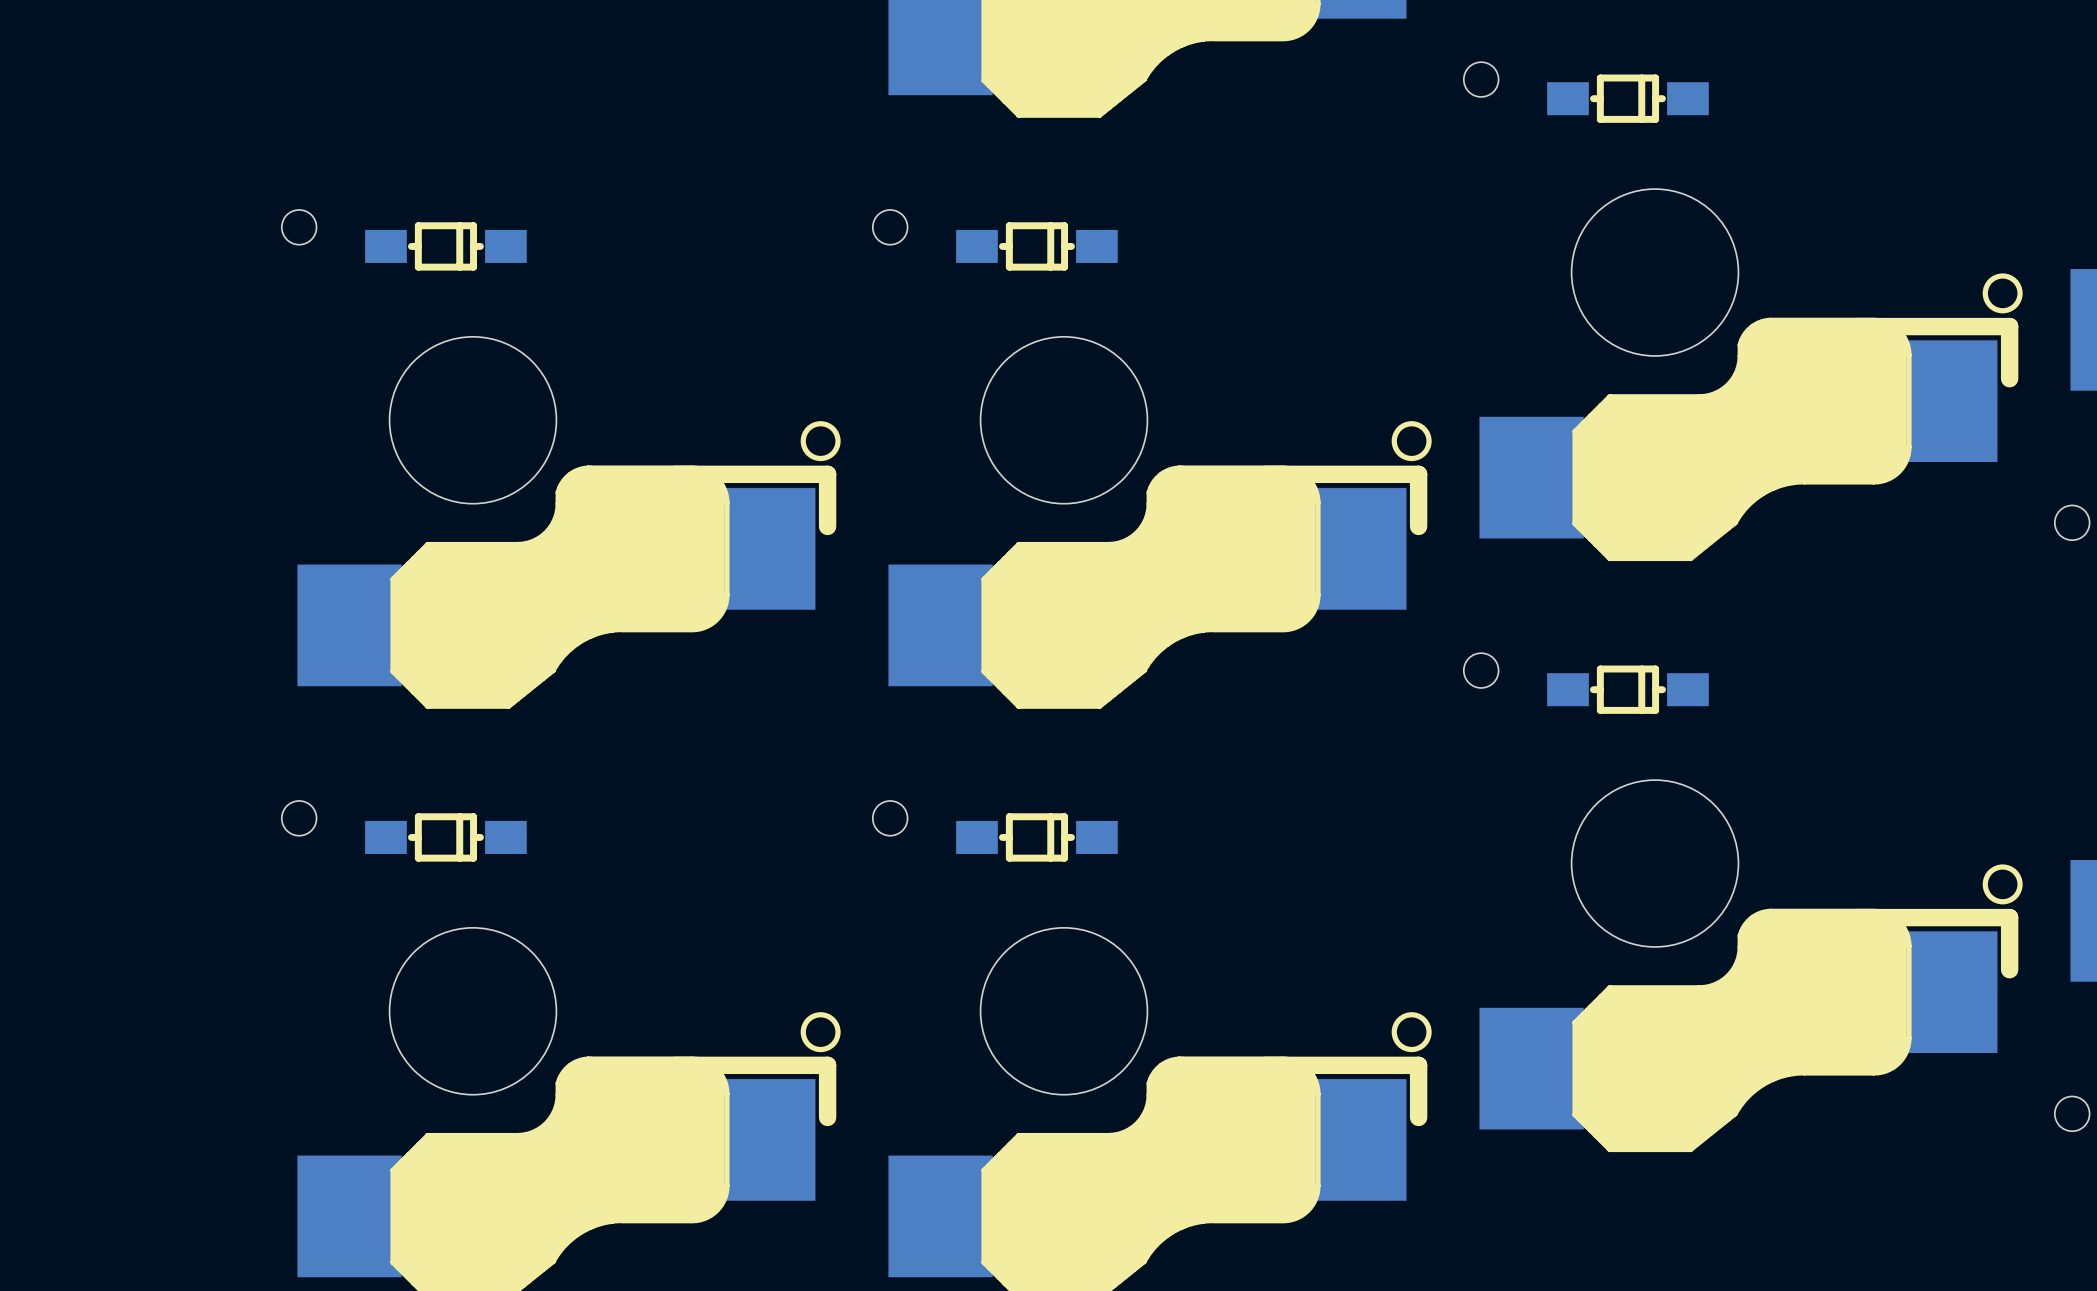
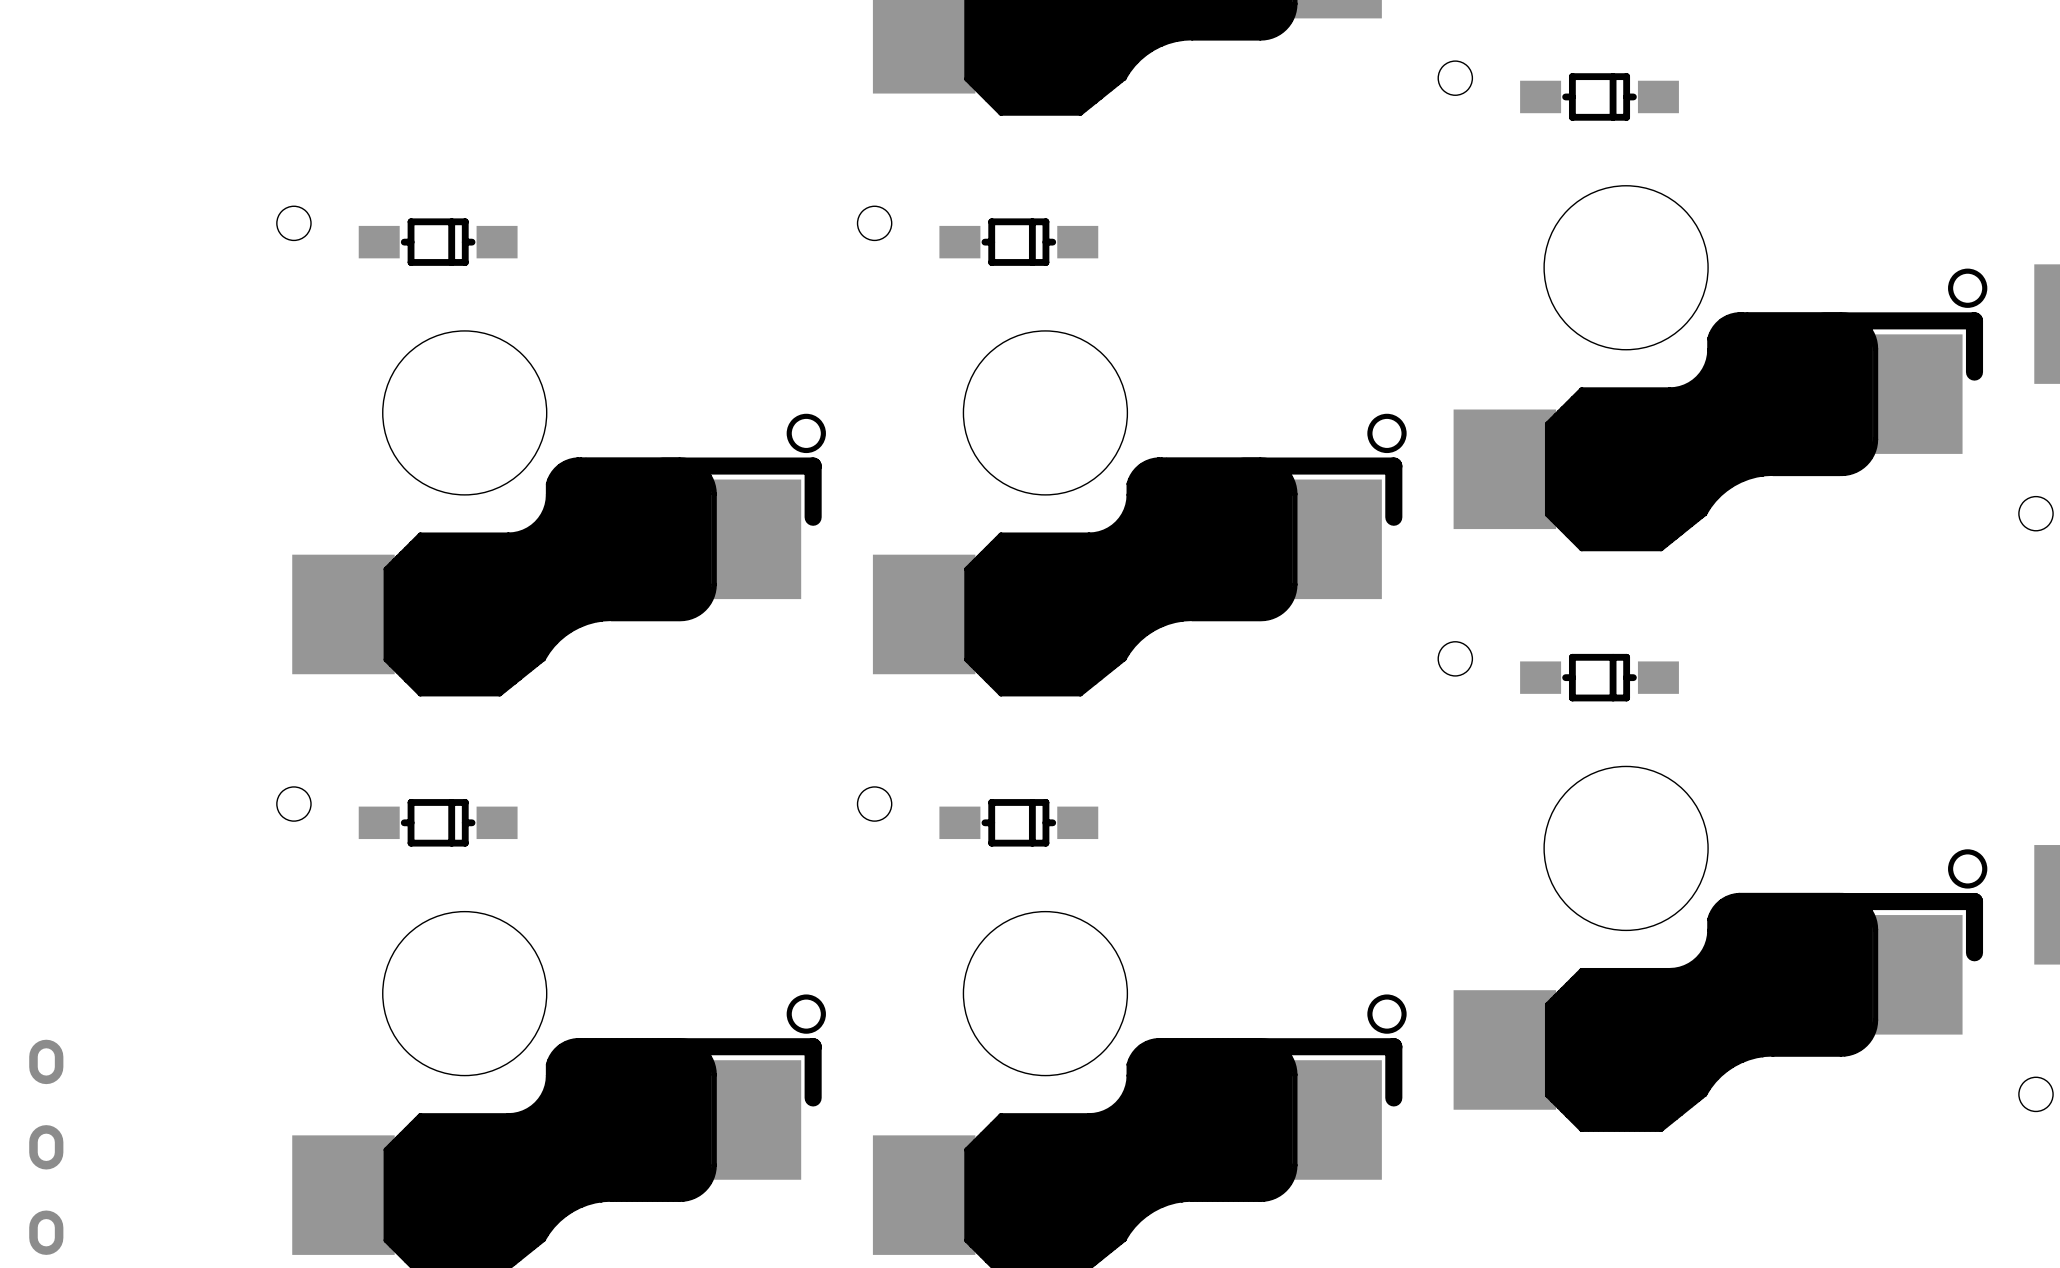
part: none -> (46, 1147)

